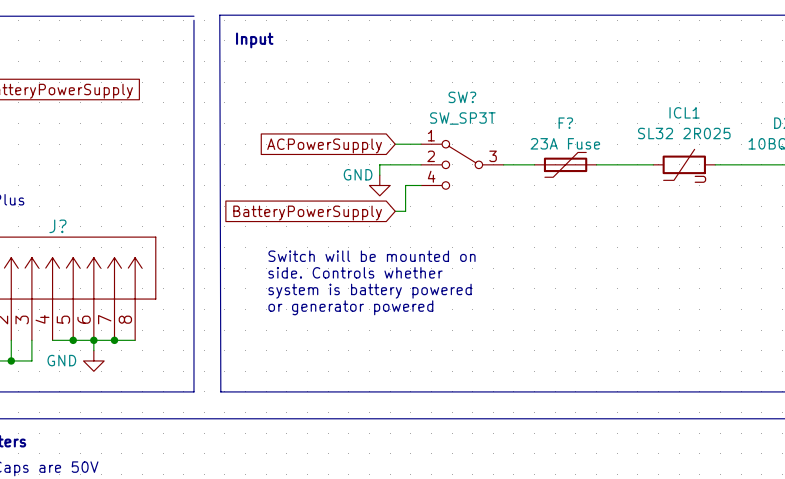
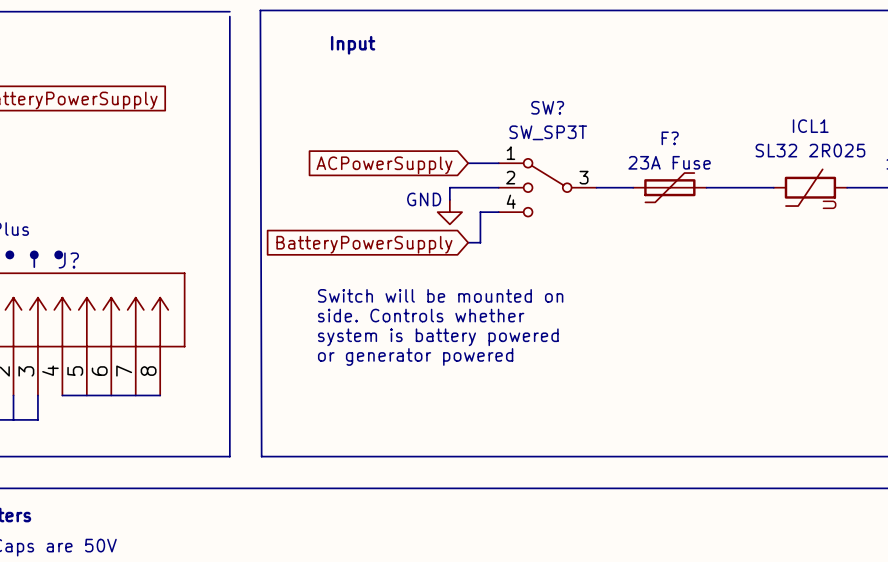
text position: Input (254, 40) -> Input (353, 45)
junction: none -> (9, 254)
junction: none -> (34, 254)
junction: none -> (58, 254)
junction: (73, 340) -> none
wire: (93, 340) (93, 350) -> (34, 254) (34, 267)
junction: (93, 340) -> none
junction: (114, 340) -> none
junction: (11, 360) -> none
power symbol: GND (93, 360) -> none

